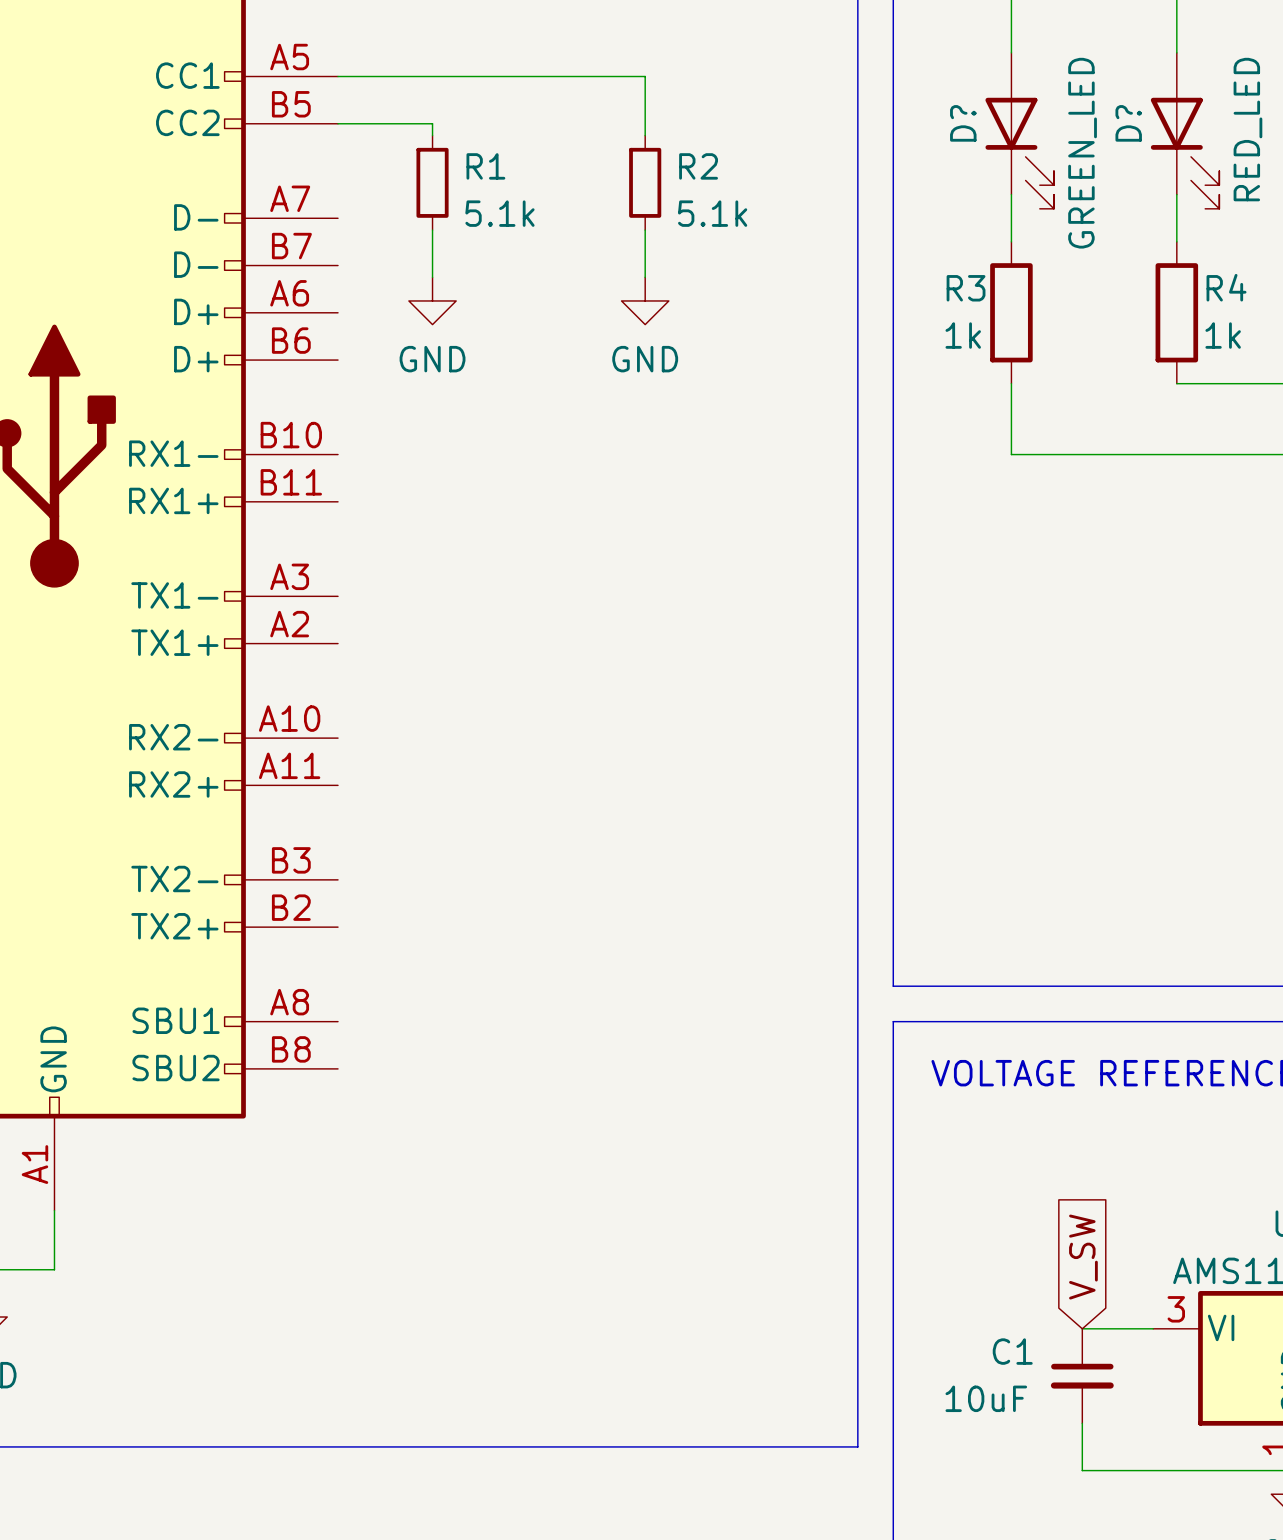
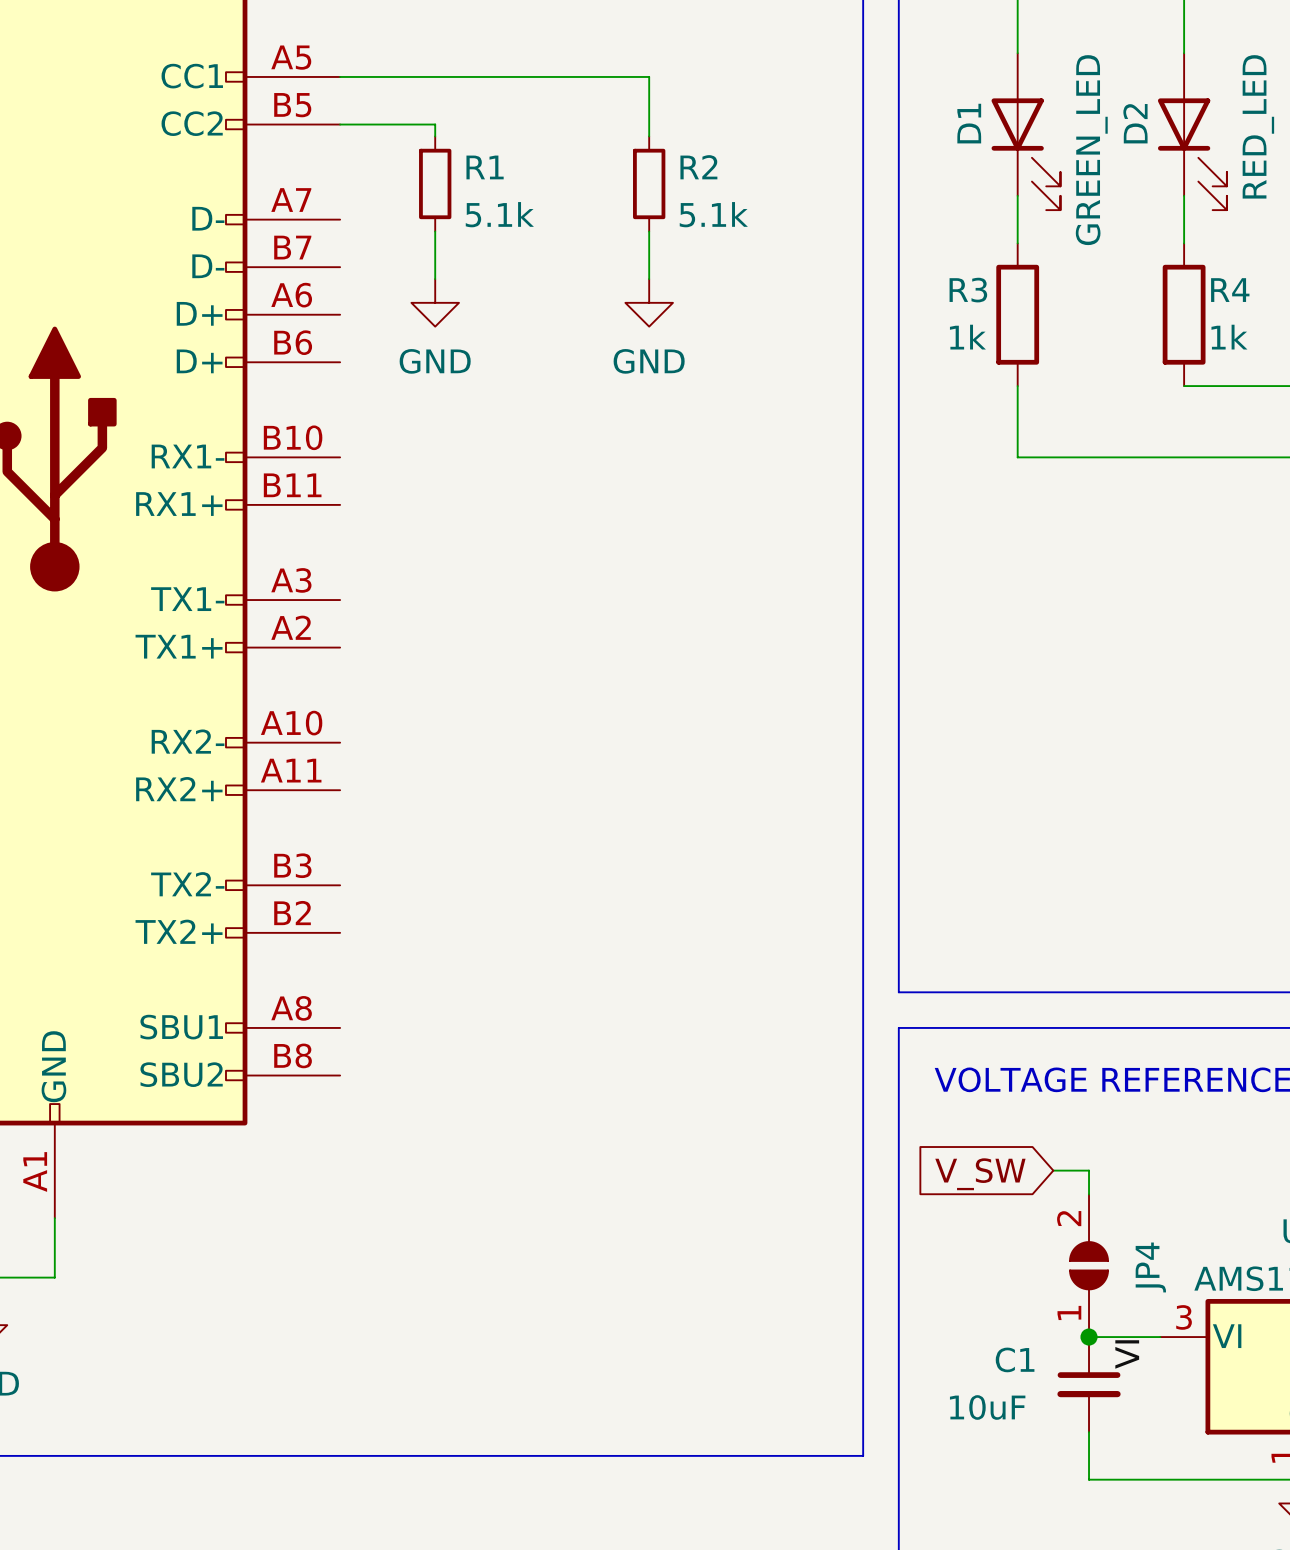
D? name: D? (963, 123) -> D1 (969, 123)
D? name: D? (1128, 123) -> D2 (1135, 123)
wire: none -> (1053, 1170) (1089, 1170) (1089, 1194)
JP4: none -> (1089, 1265)
global label rotation: 0° (1083, 1257) -> 90° counterclockwise (980, 1174)
junction: none -> (1089, 1337)
label: none -> VI (1127, 1354)

